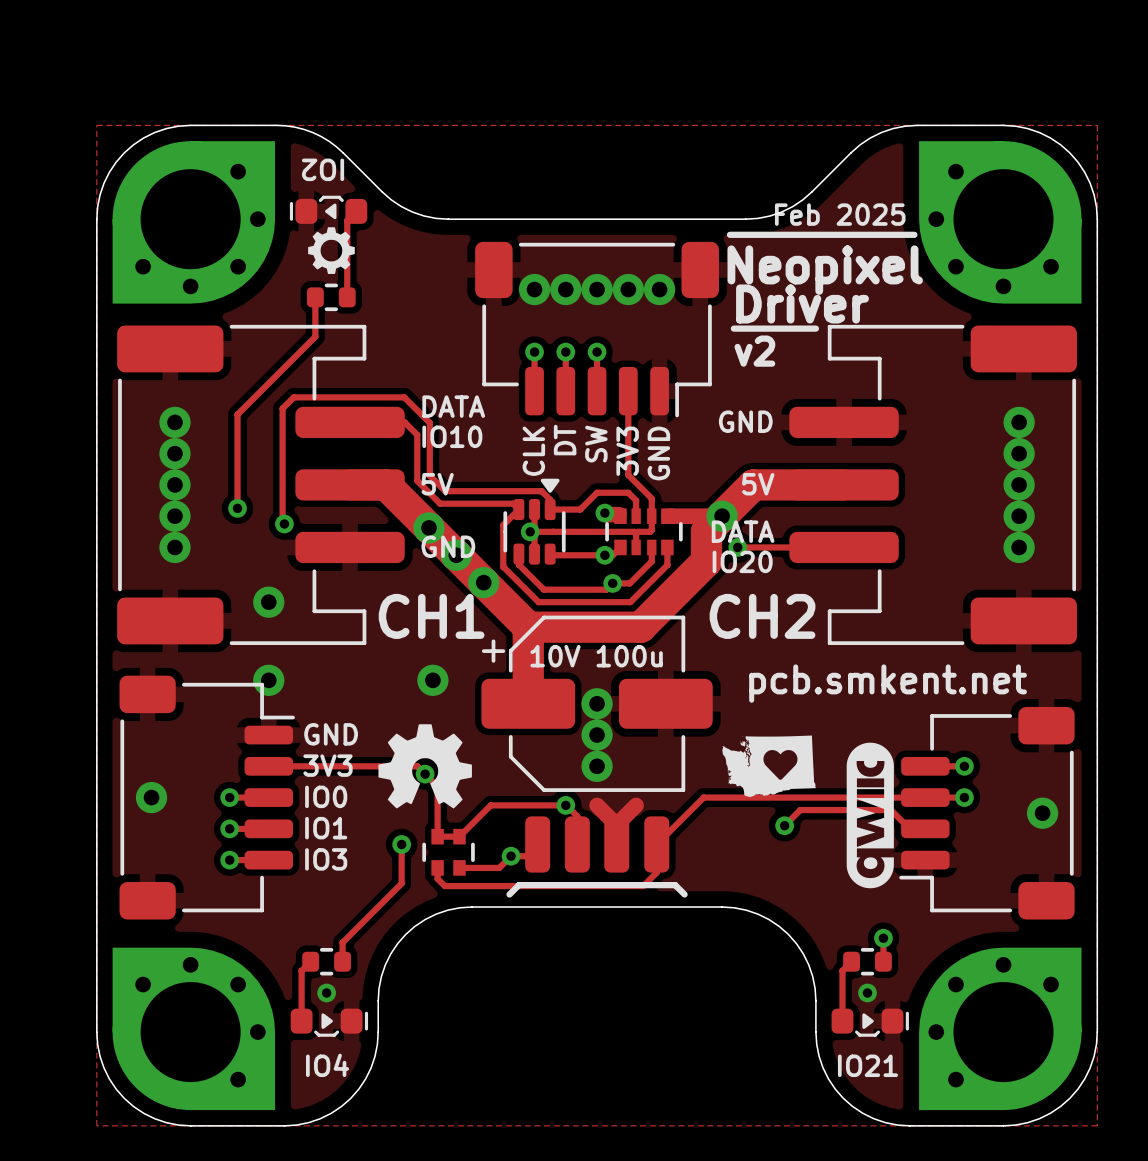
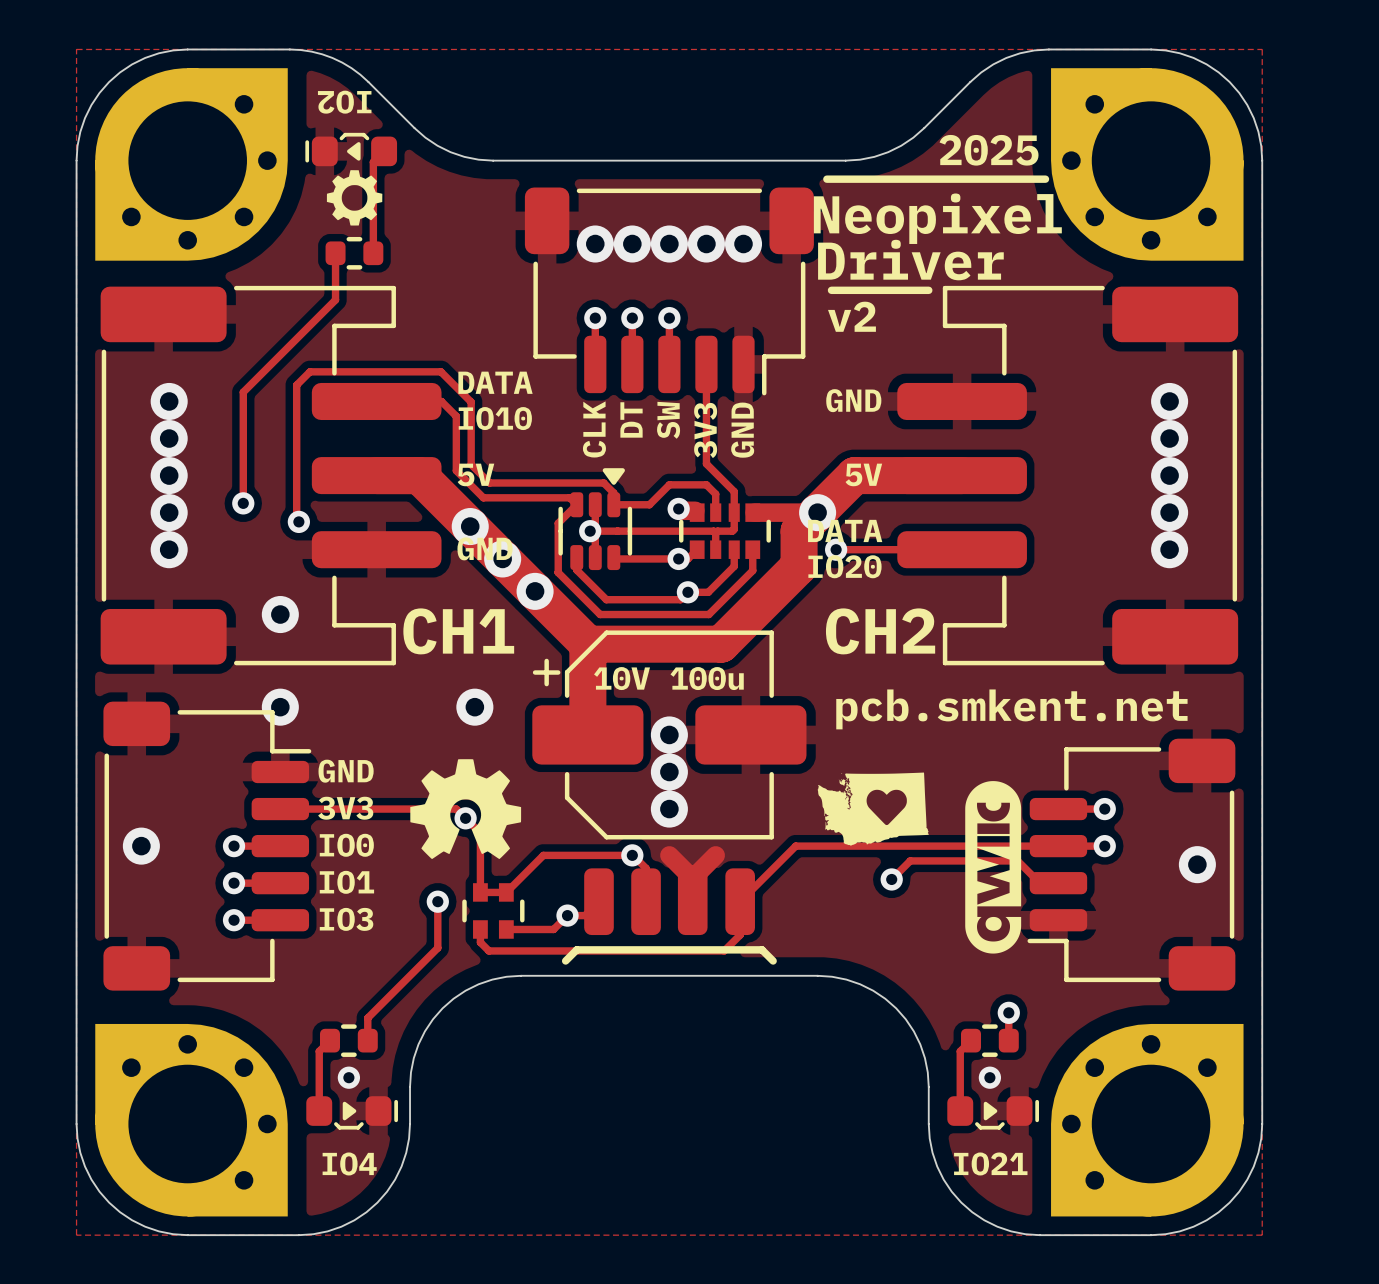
text: Feb 2025 (840, 214) -> 2025 (989, 150)

